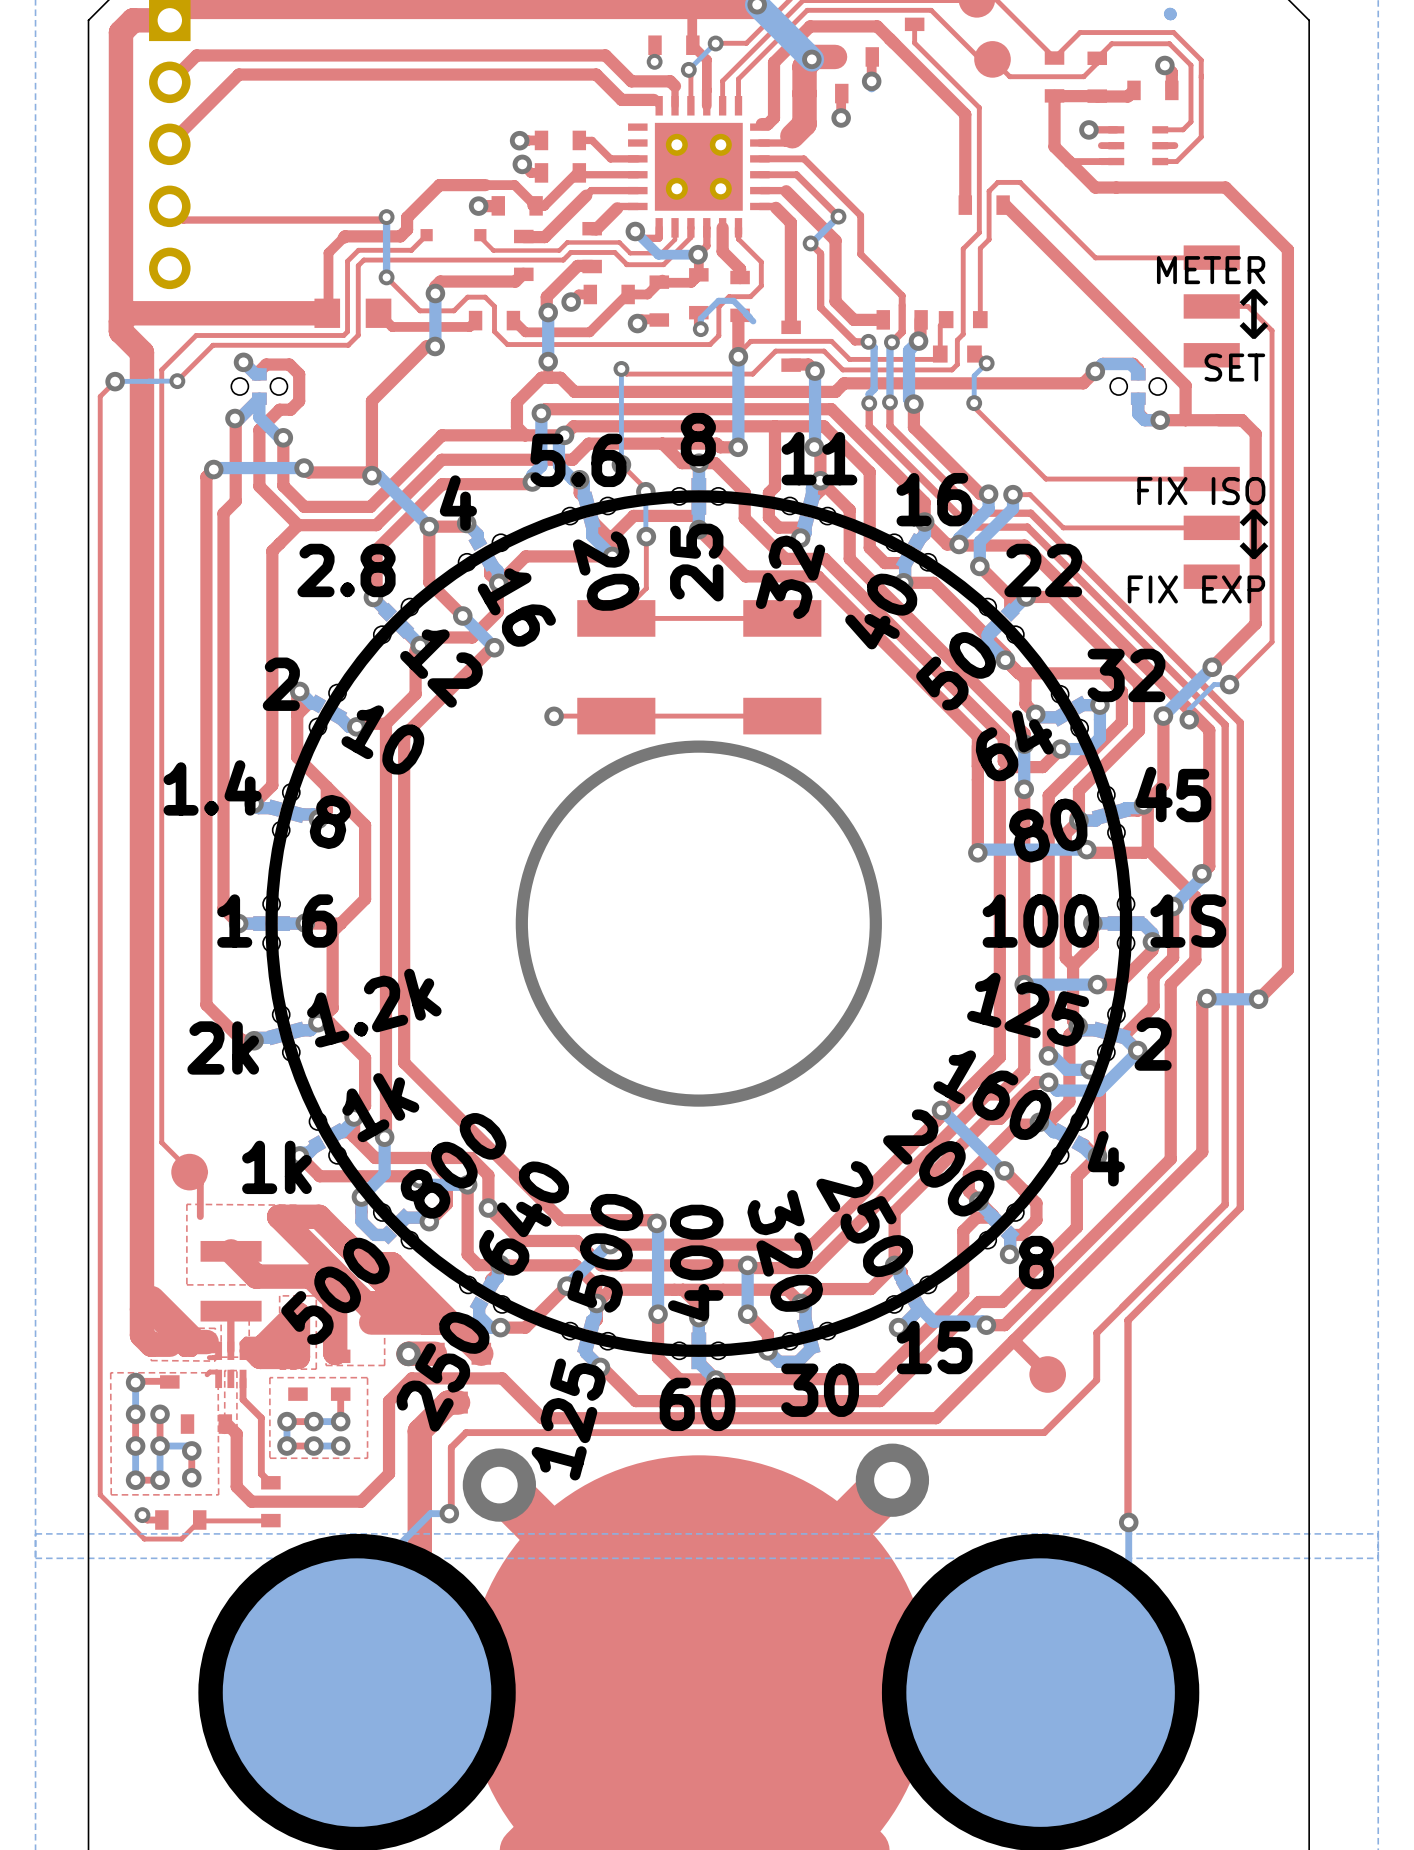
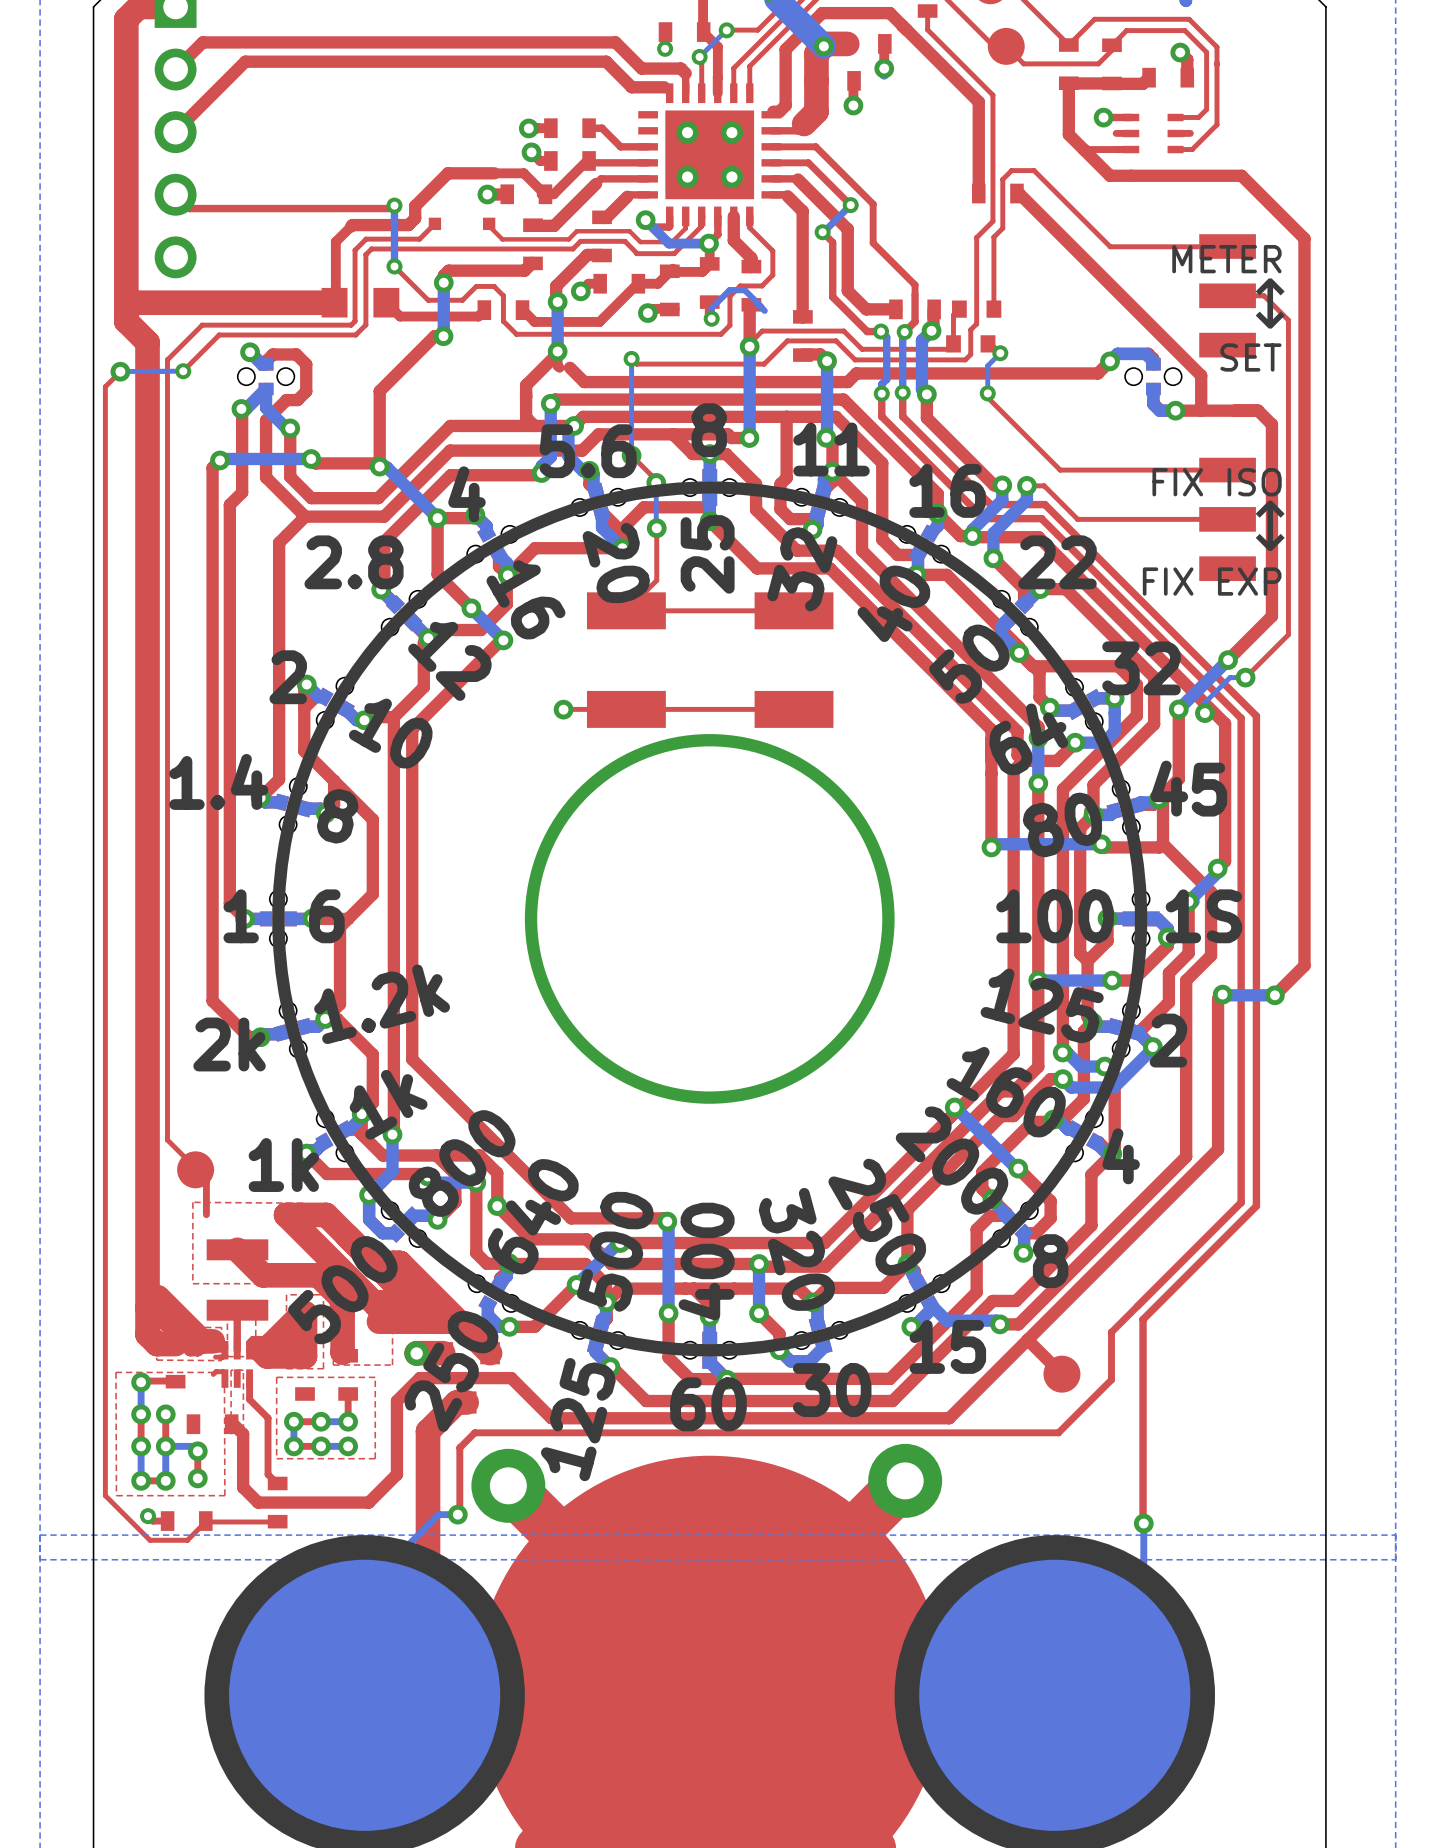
top track: (560, 377) (541, 377) (516, 402) -> (557, 353) (526, 385) (526, 392)

